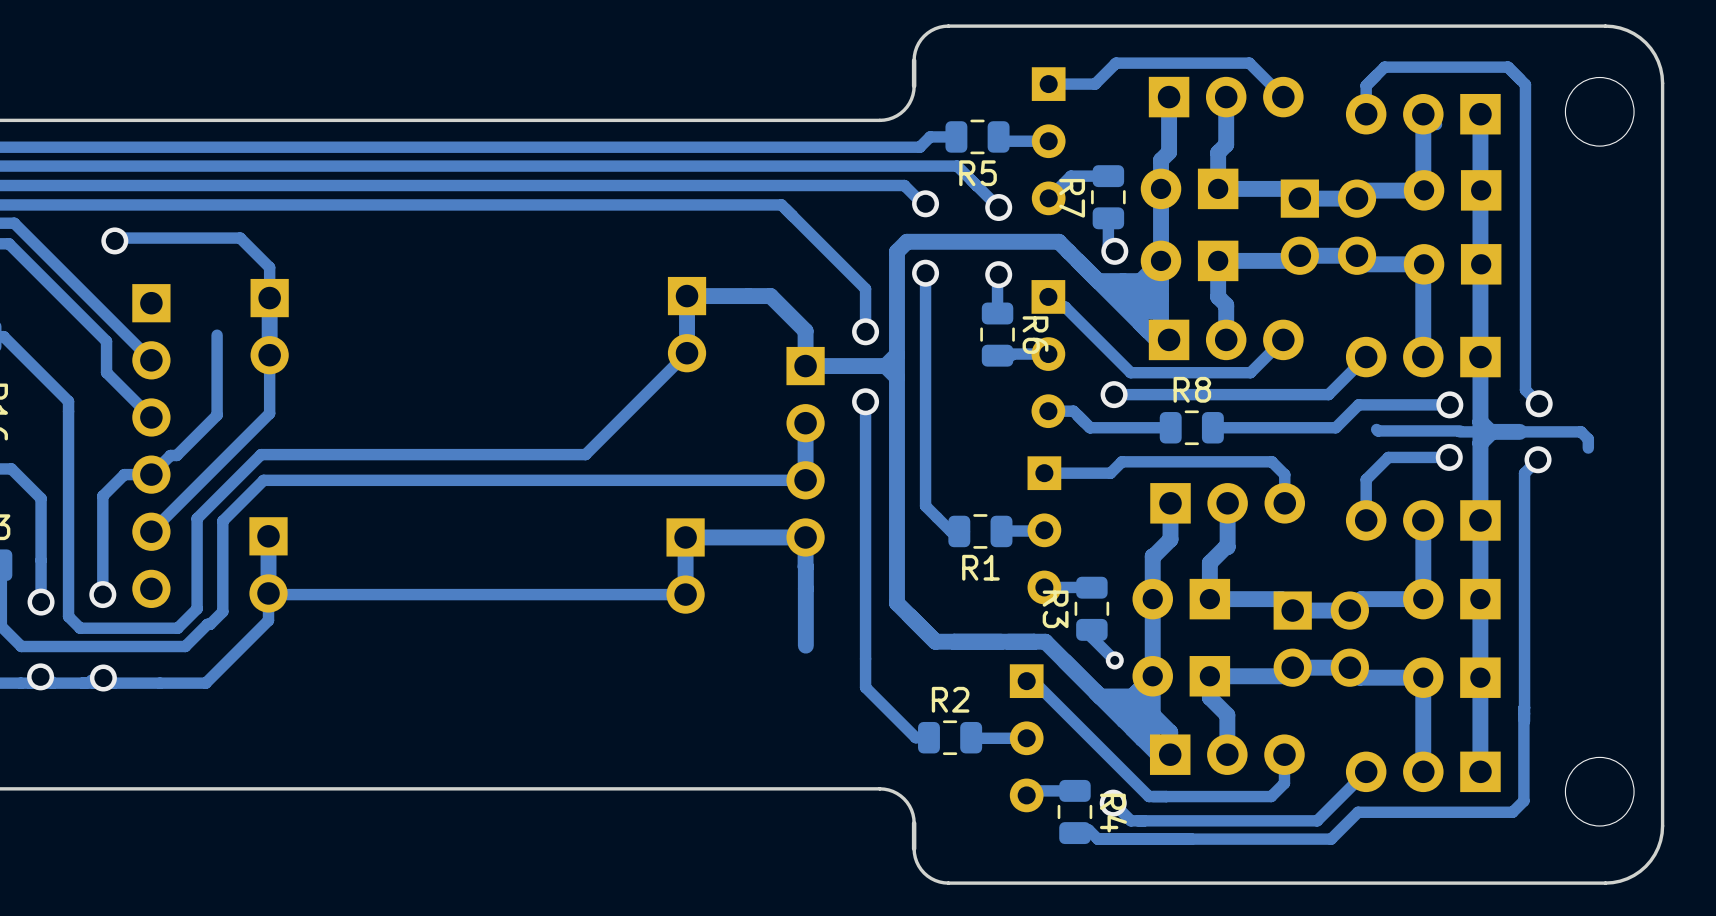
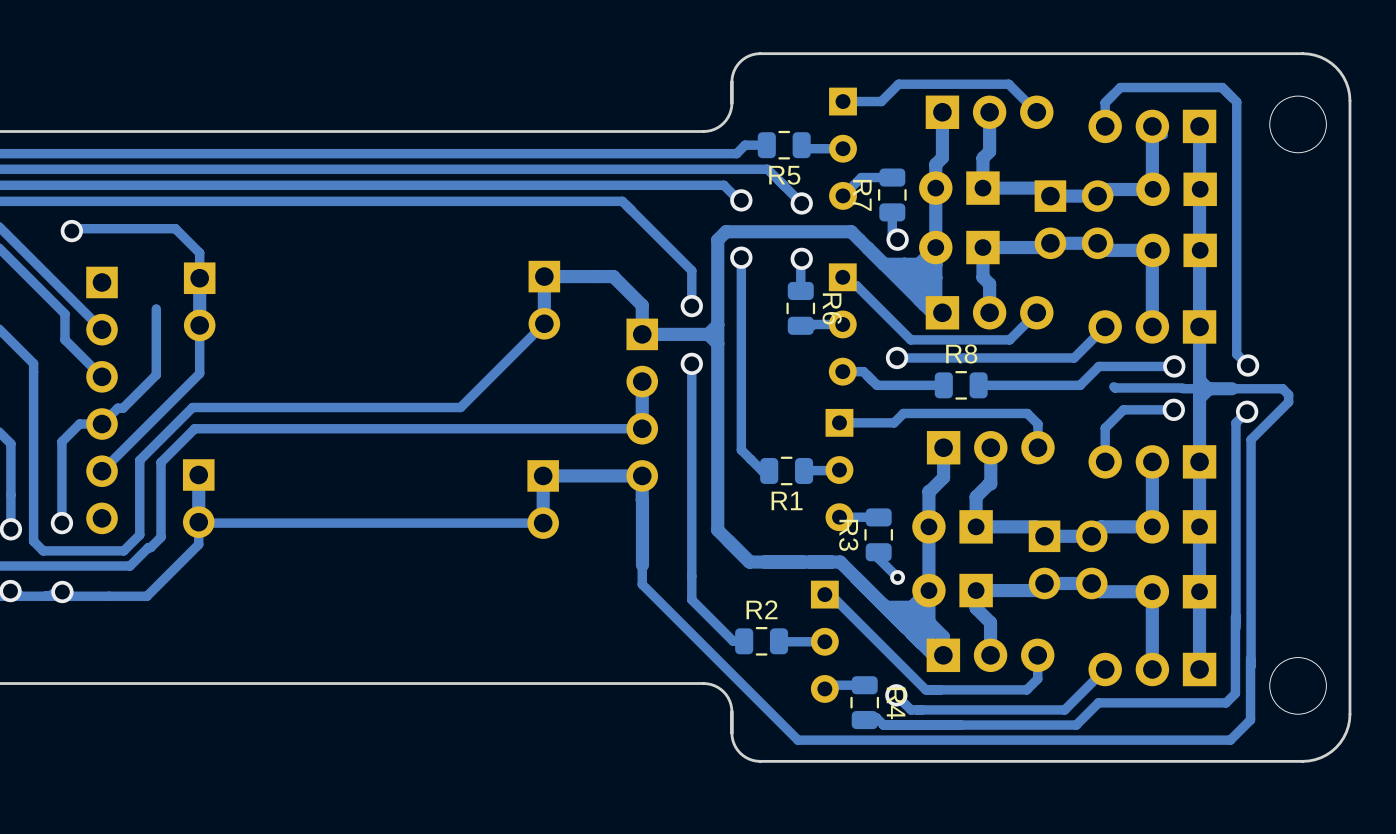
track: none -> (1288, 402) (1251, 439) (1250, 666)
track: none -> (642, 518) (642, 584) (797, 740) (1230, 740) (1250, 719) (1250, 658)

